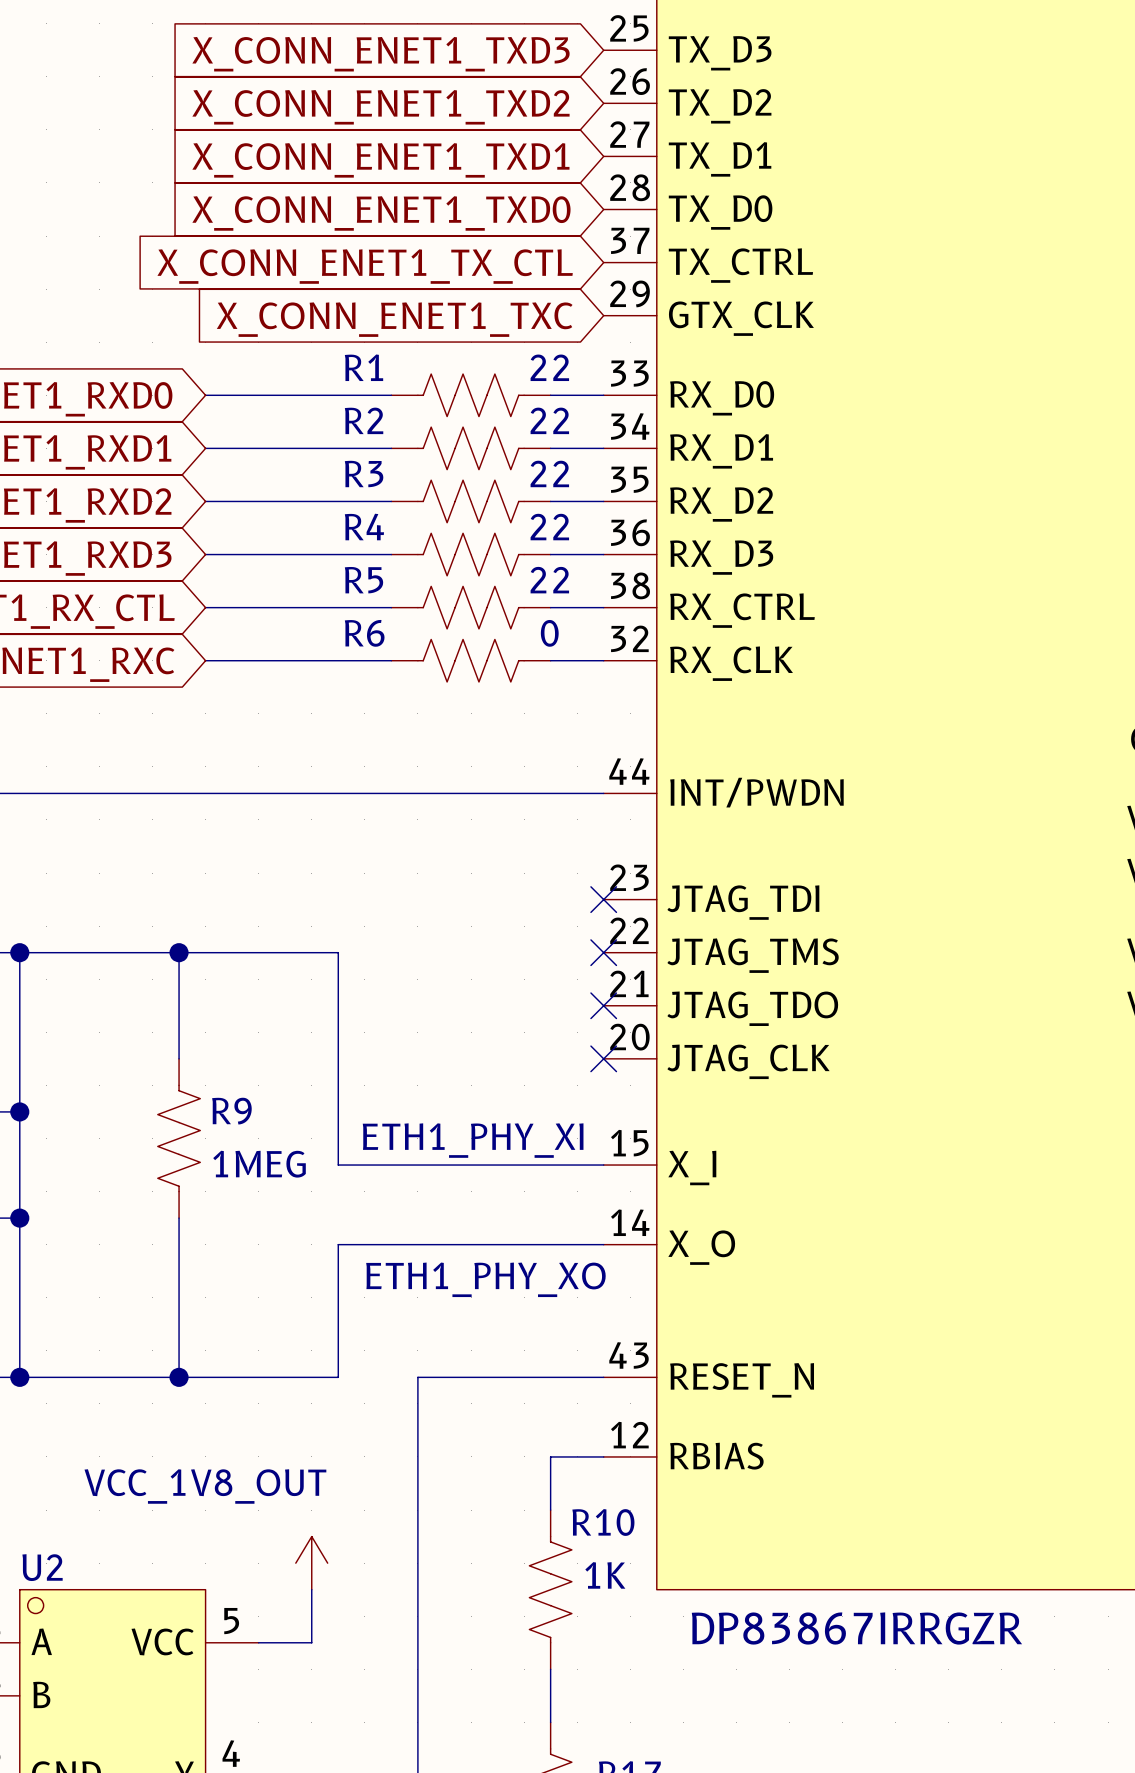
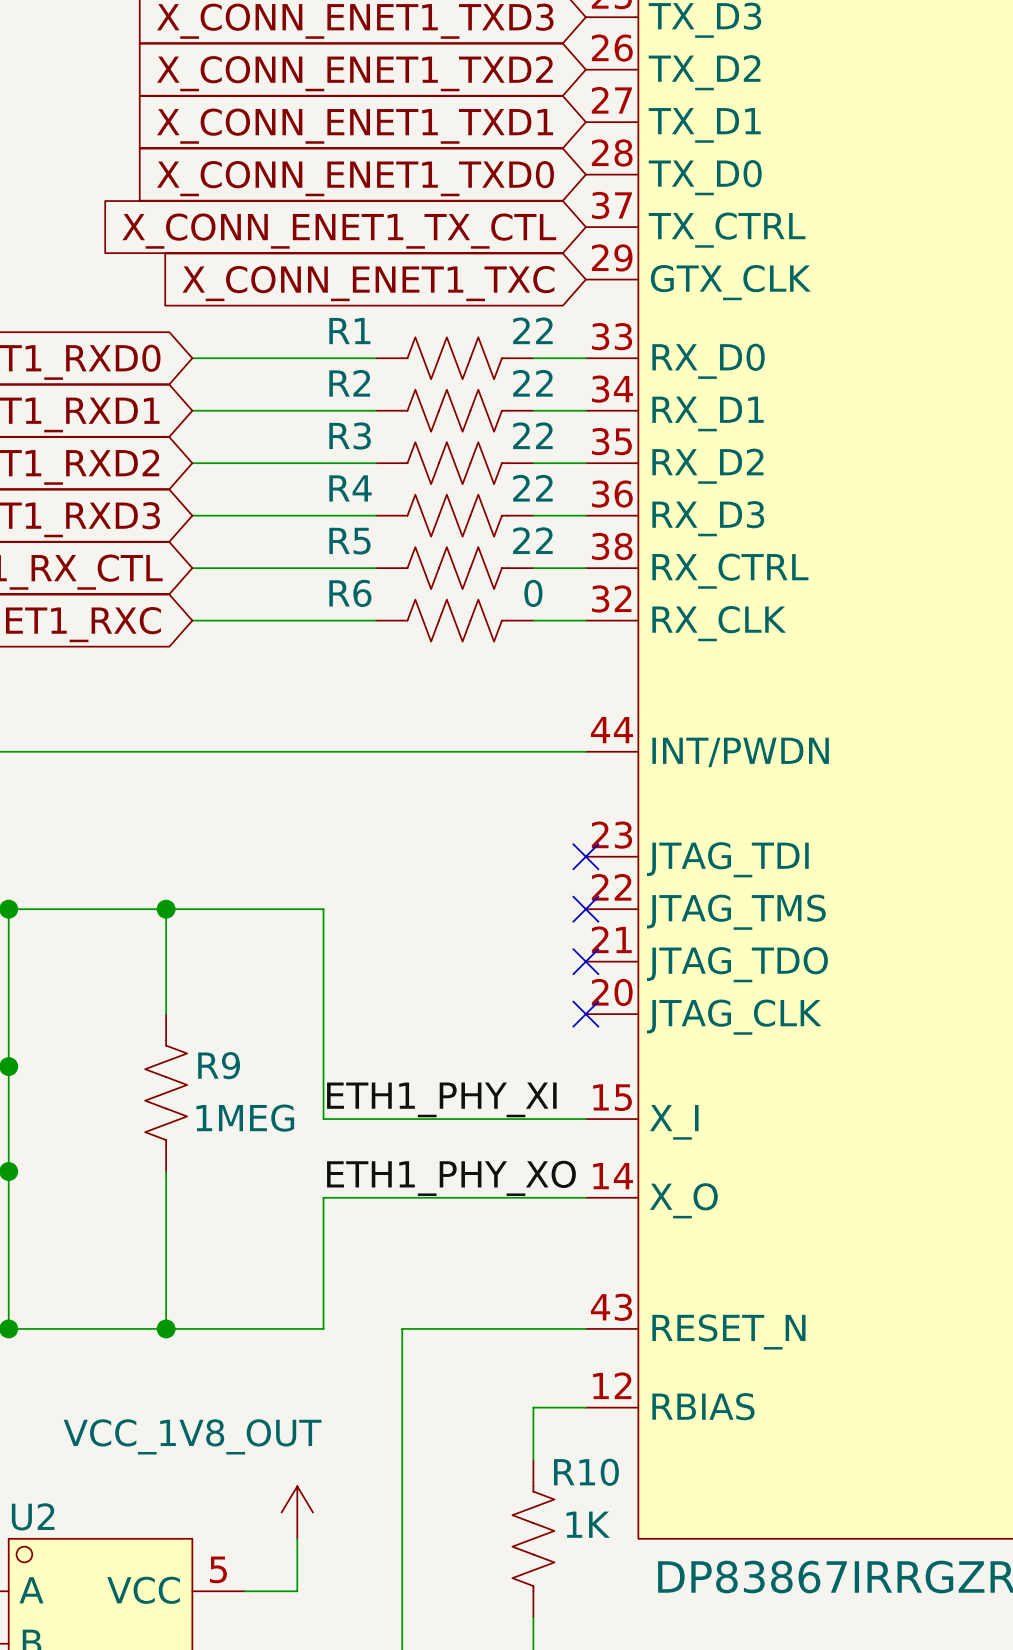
text: ETH1_PHY_XI (473, 1140) -> none
label: none -> ETH1_PHY_XI (441, 1099)
label: none -> ETH1_PHY_XO (451, 1178)
text: ETH1_PHY_XO (485, 1279) -> none

